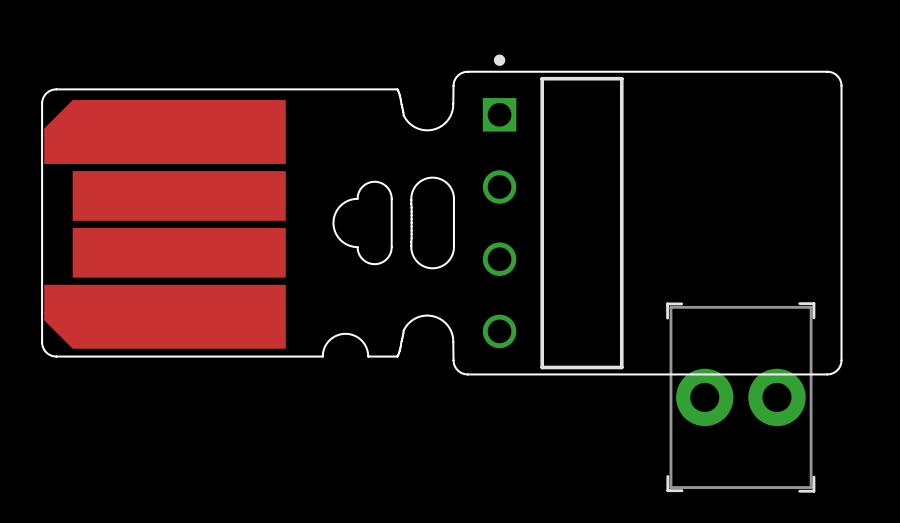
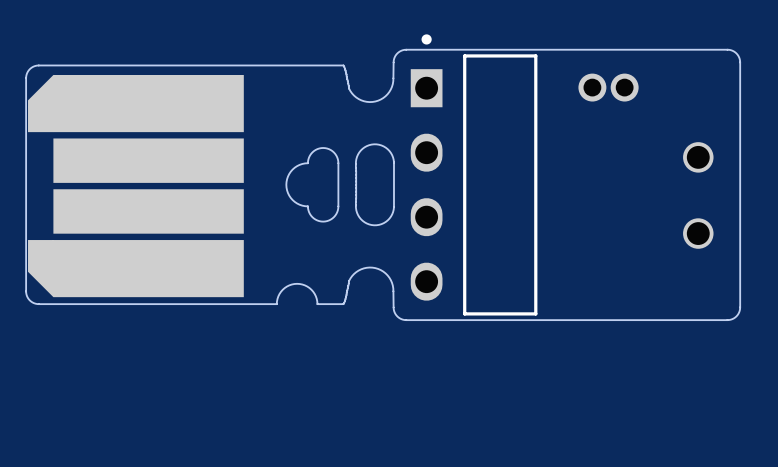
part footprint: [482, 54, 624, 370] -> [410, 34, 538, 316]
part: none -> (608, 87)
part: none -> (698, 195)
part: (740, 397) -> none

